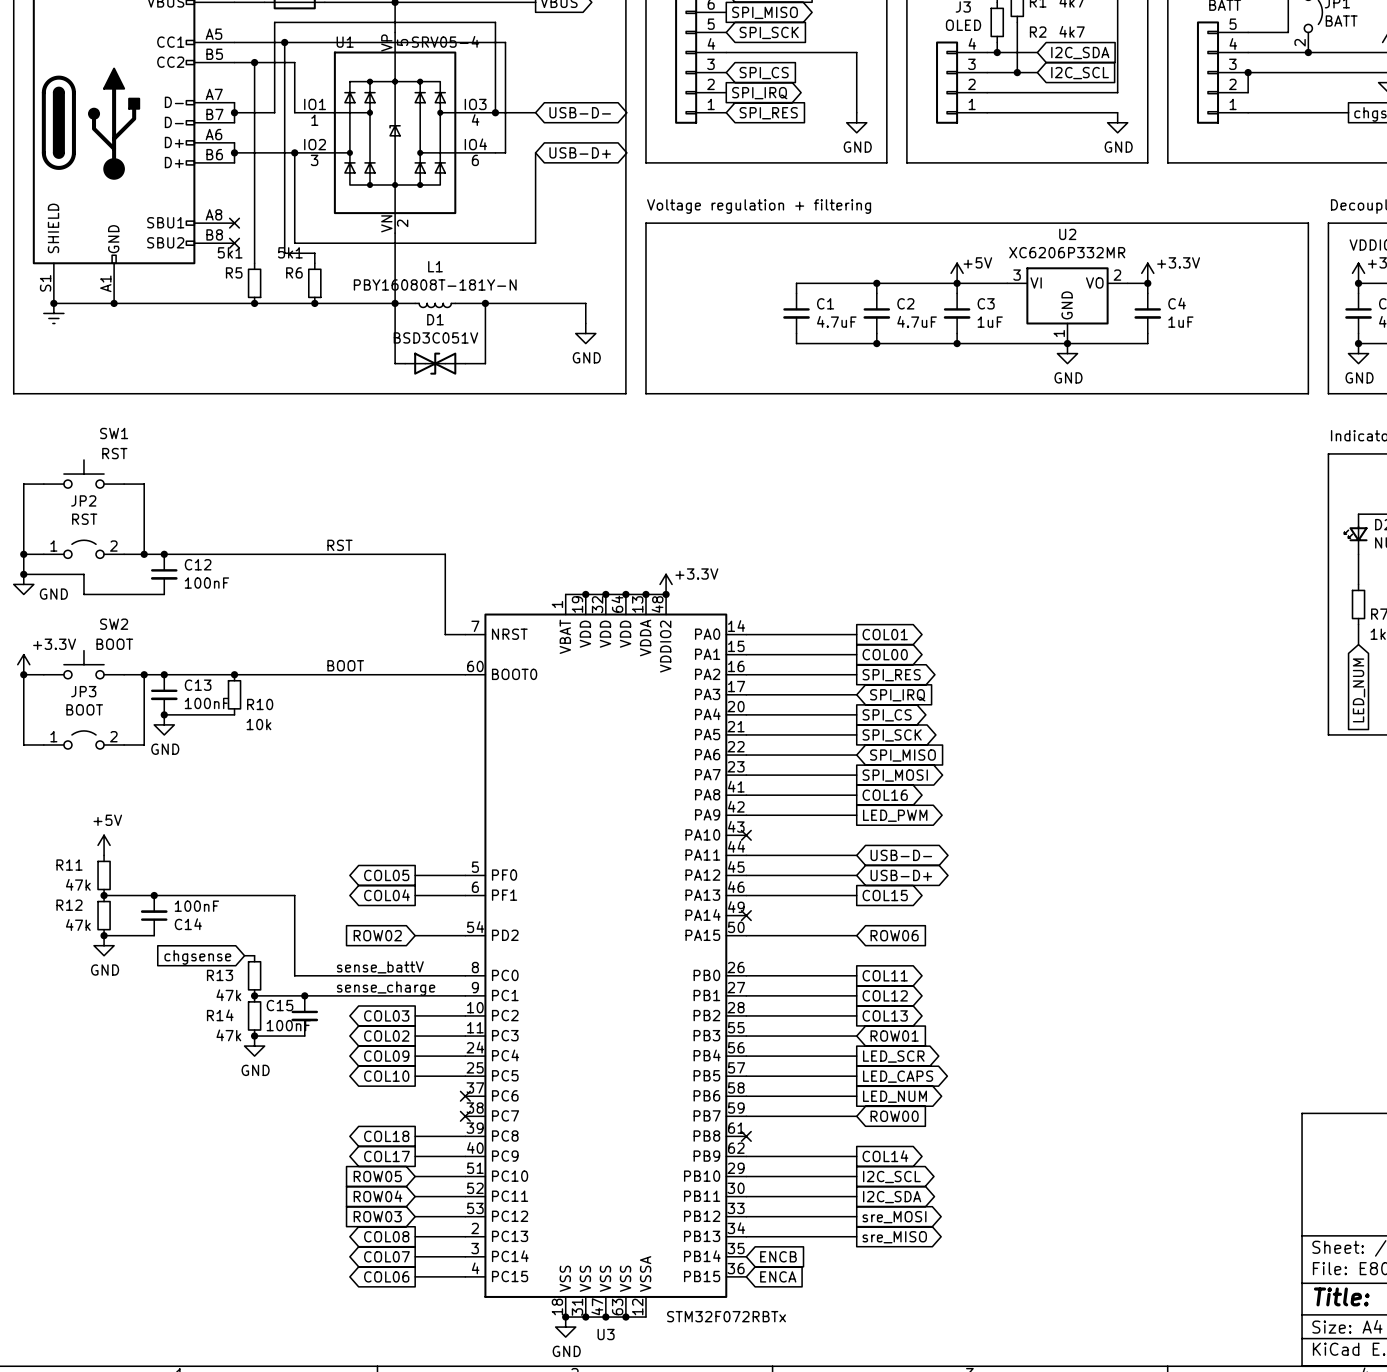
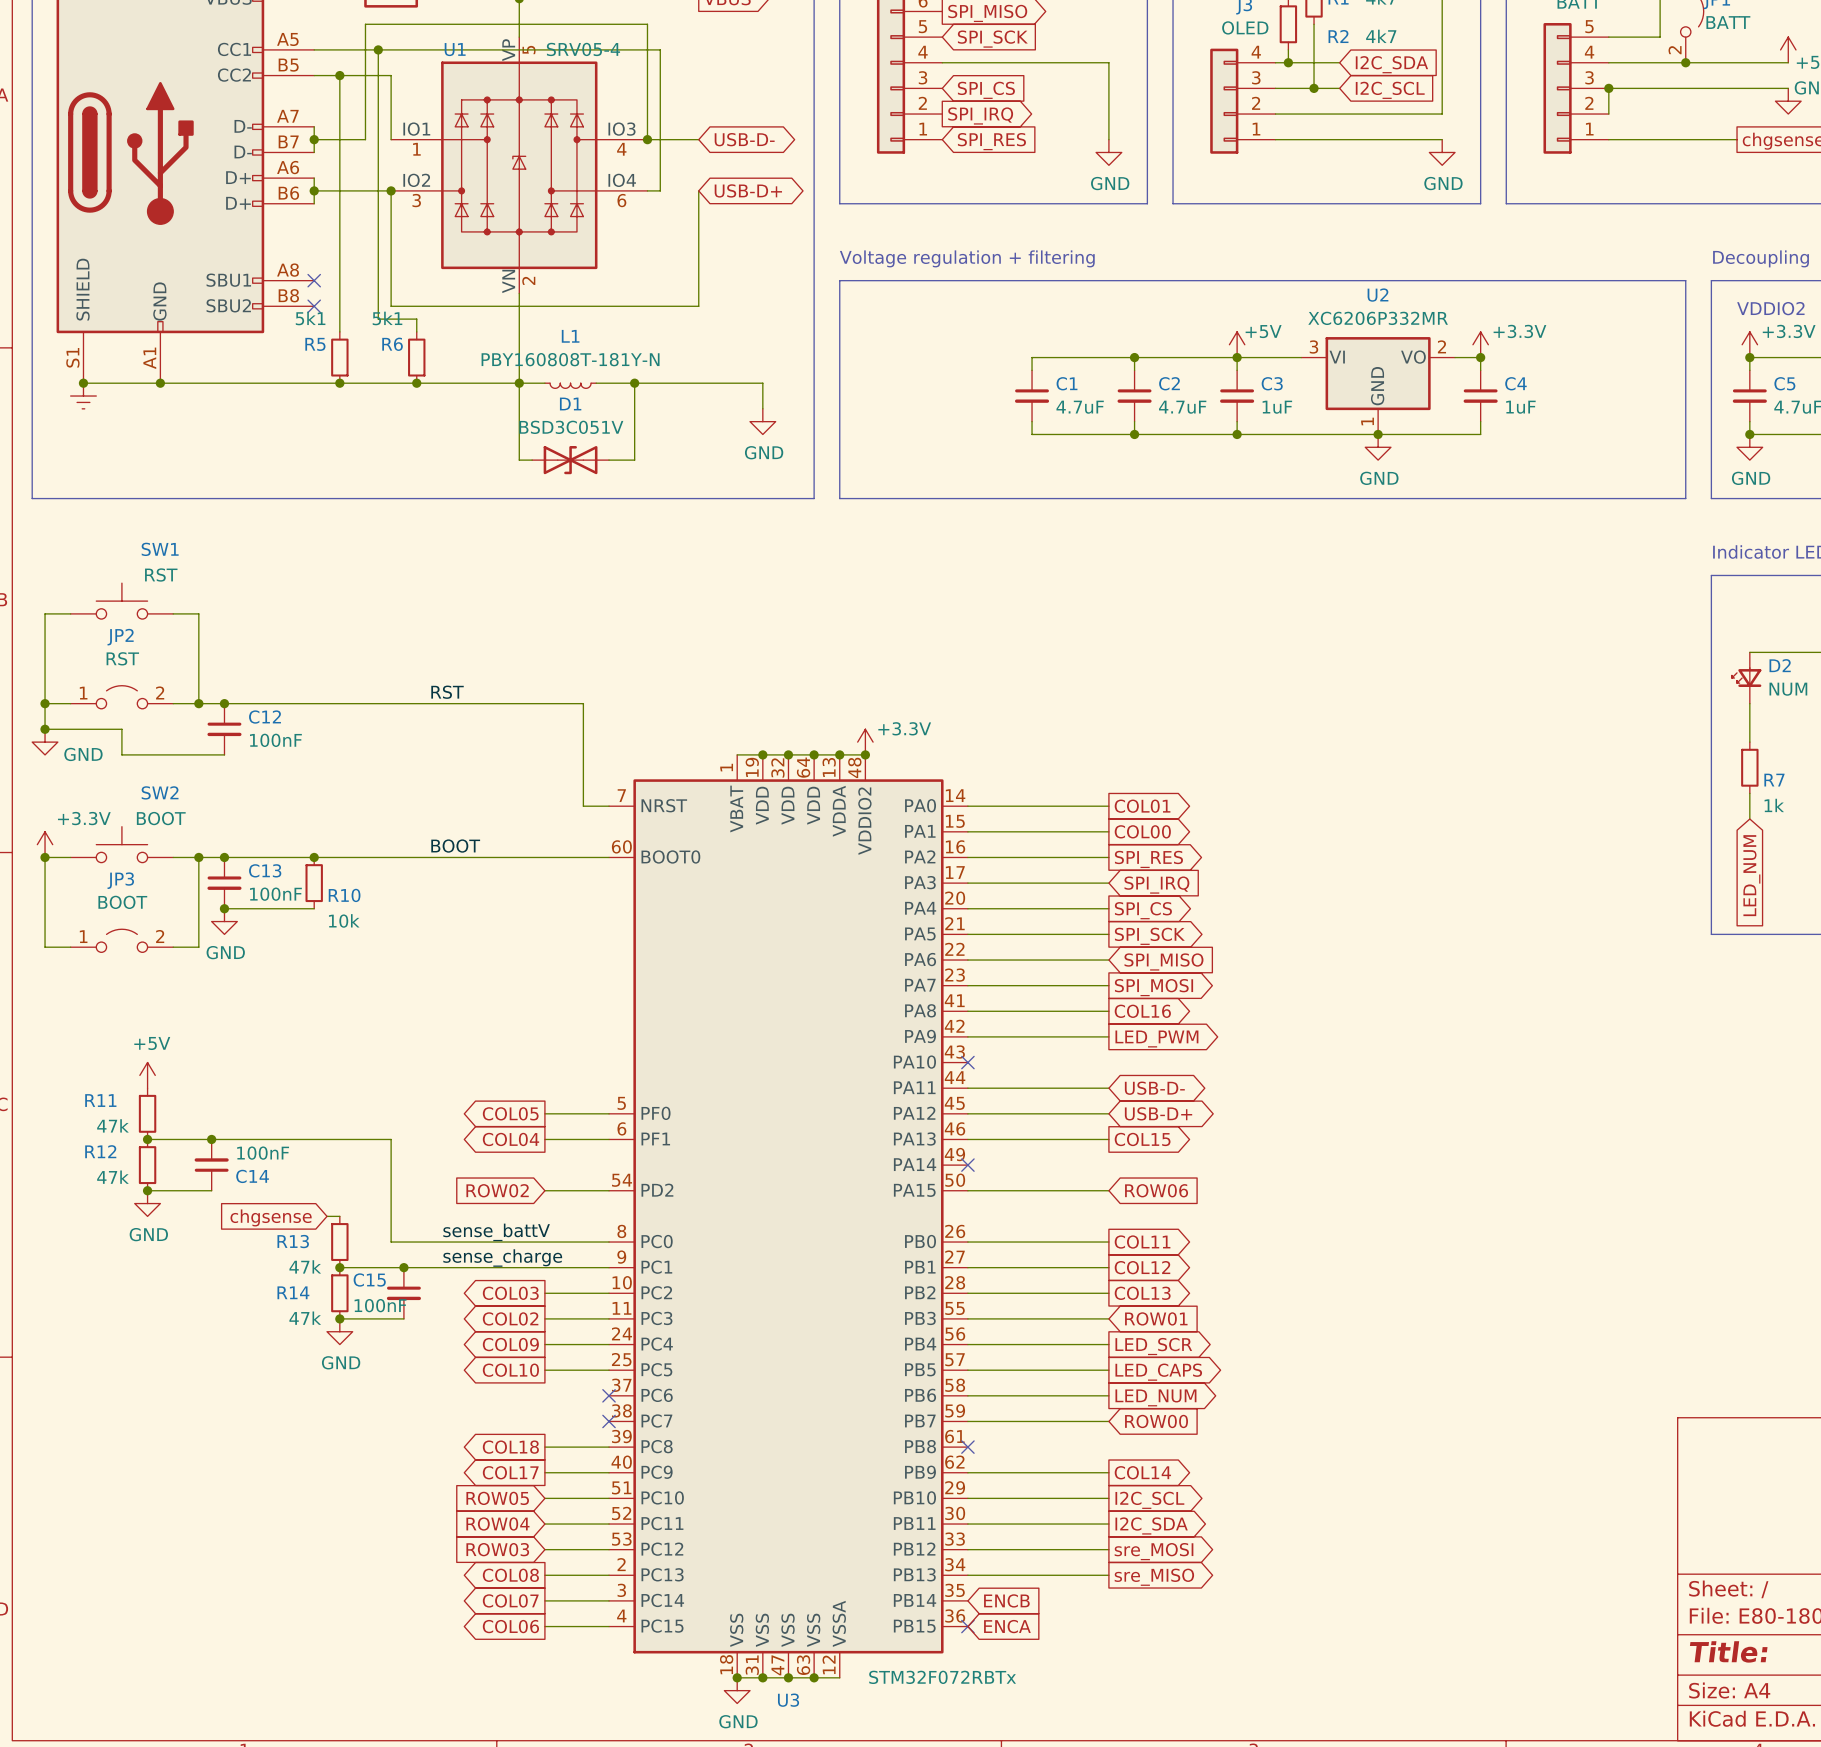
no-connect mark: none -> (967, 1626)

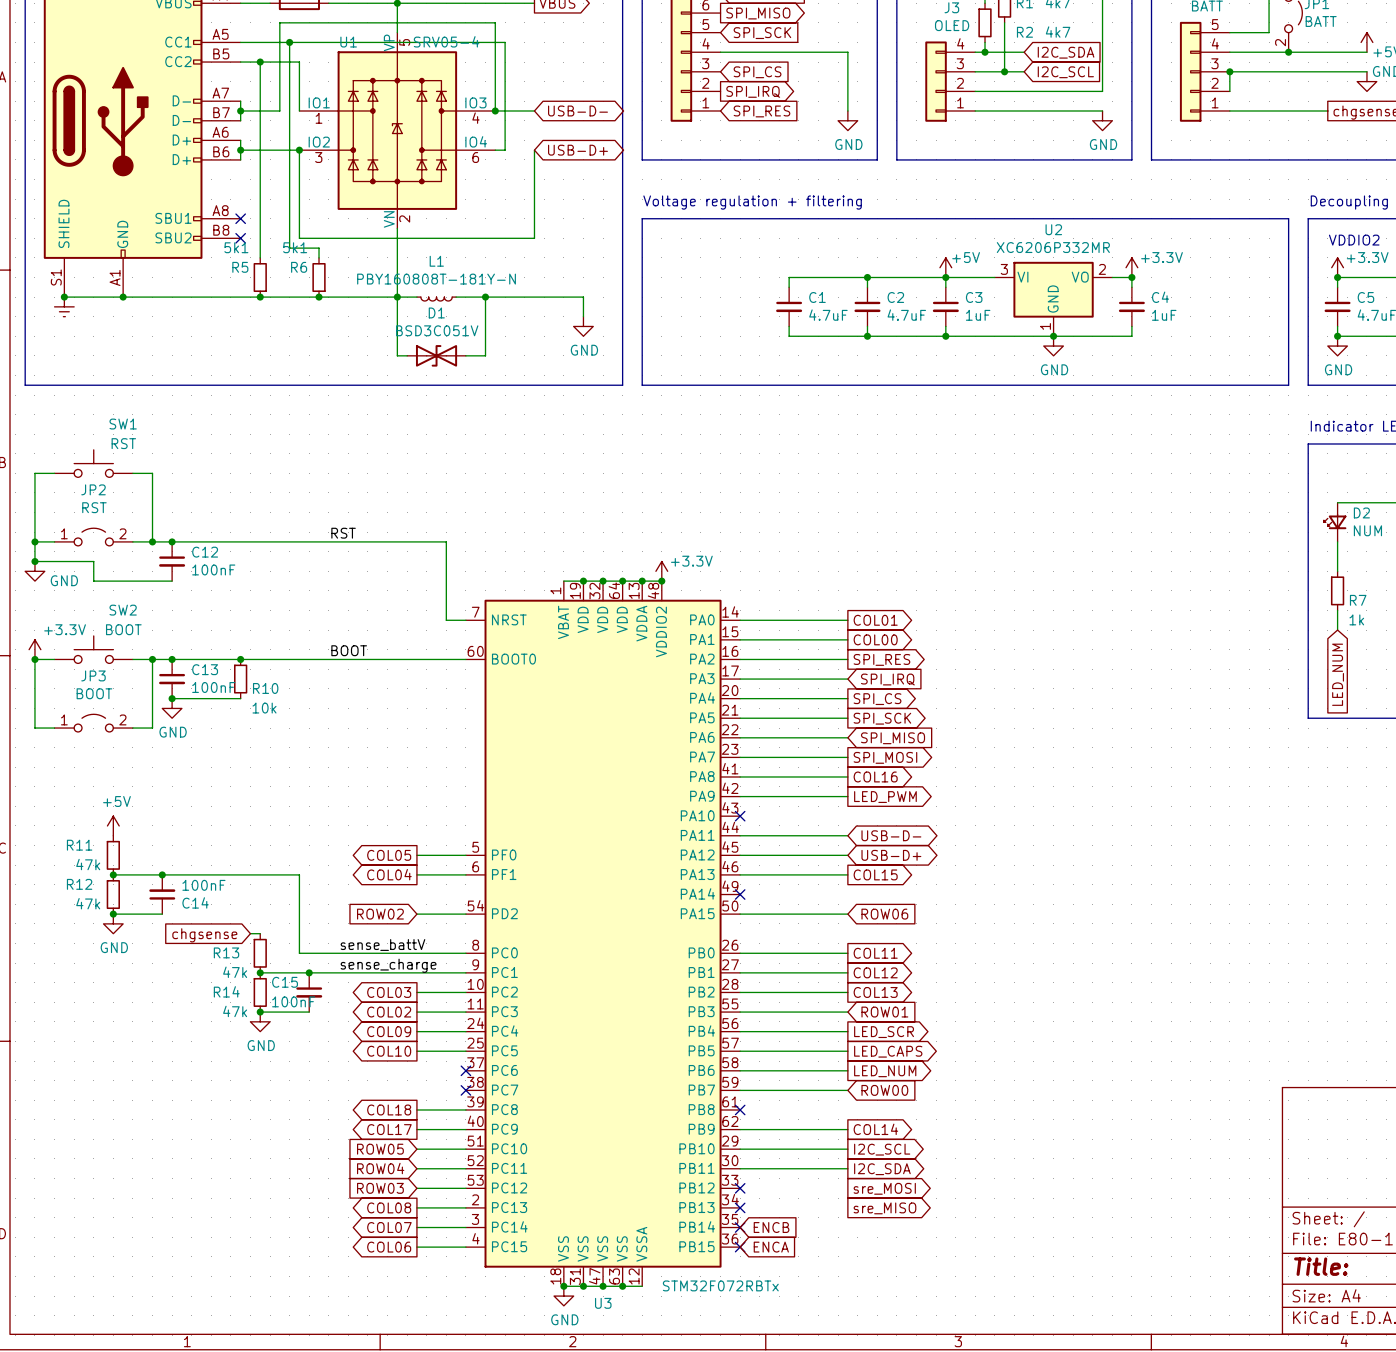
wire: (967, 1549) (1108, 1549) -> none
no-connect mark: none -> (740, 1188)
wire: (967, 1575) (1108, 1575) -> none
no-connect mark: none -> (740, 1207)
no-connect mark: none -> (740, 1227)

